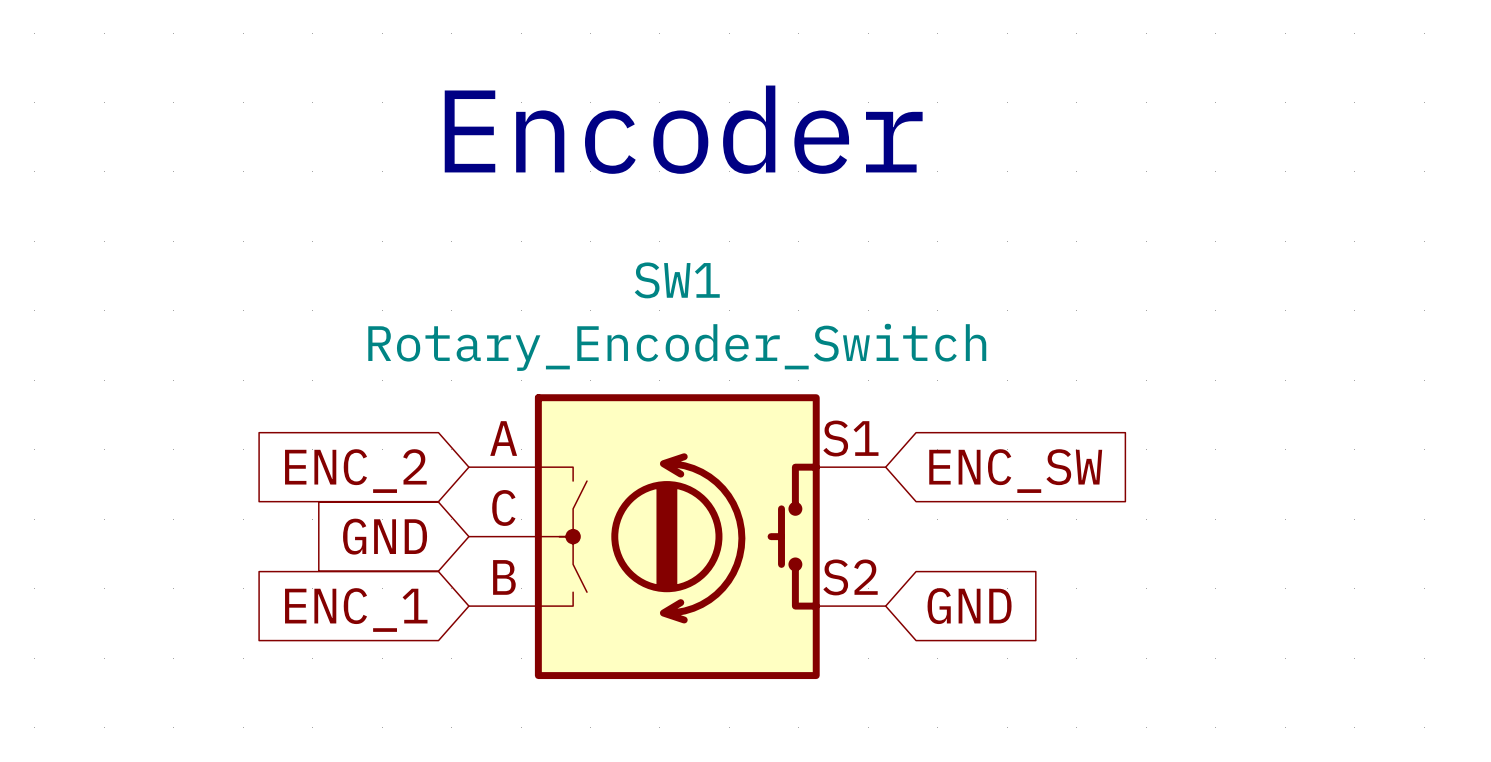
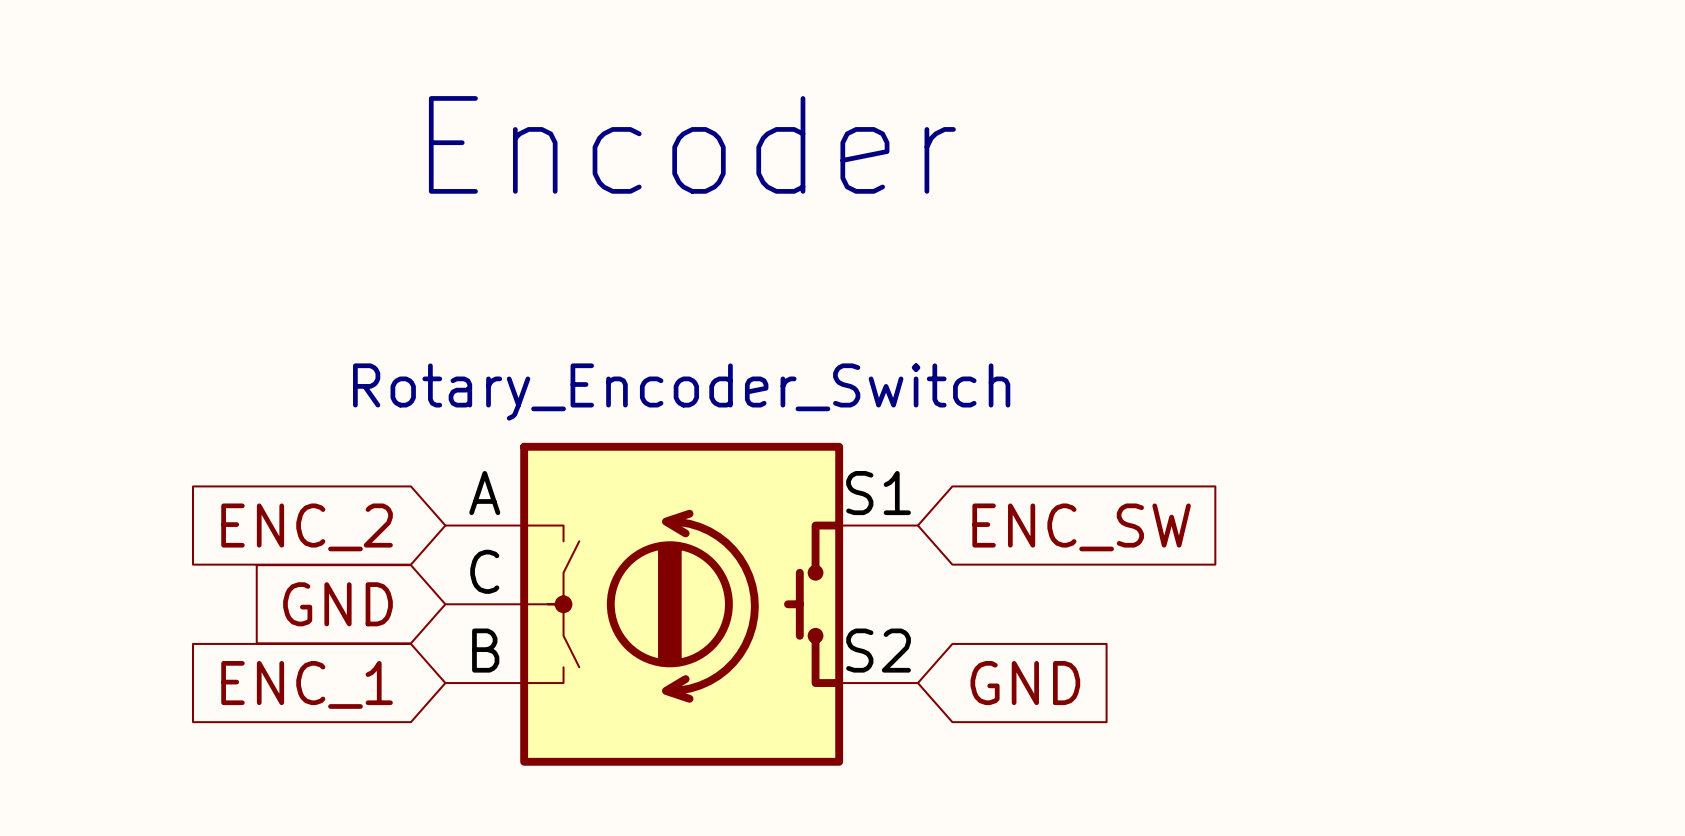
SW1 name: SW1 (677, 280) -> none

